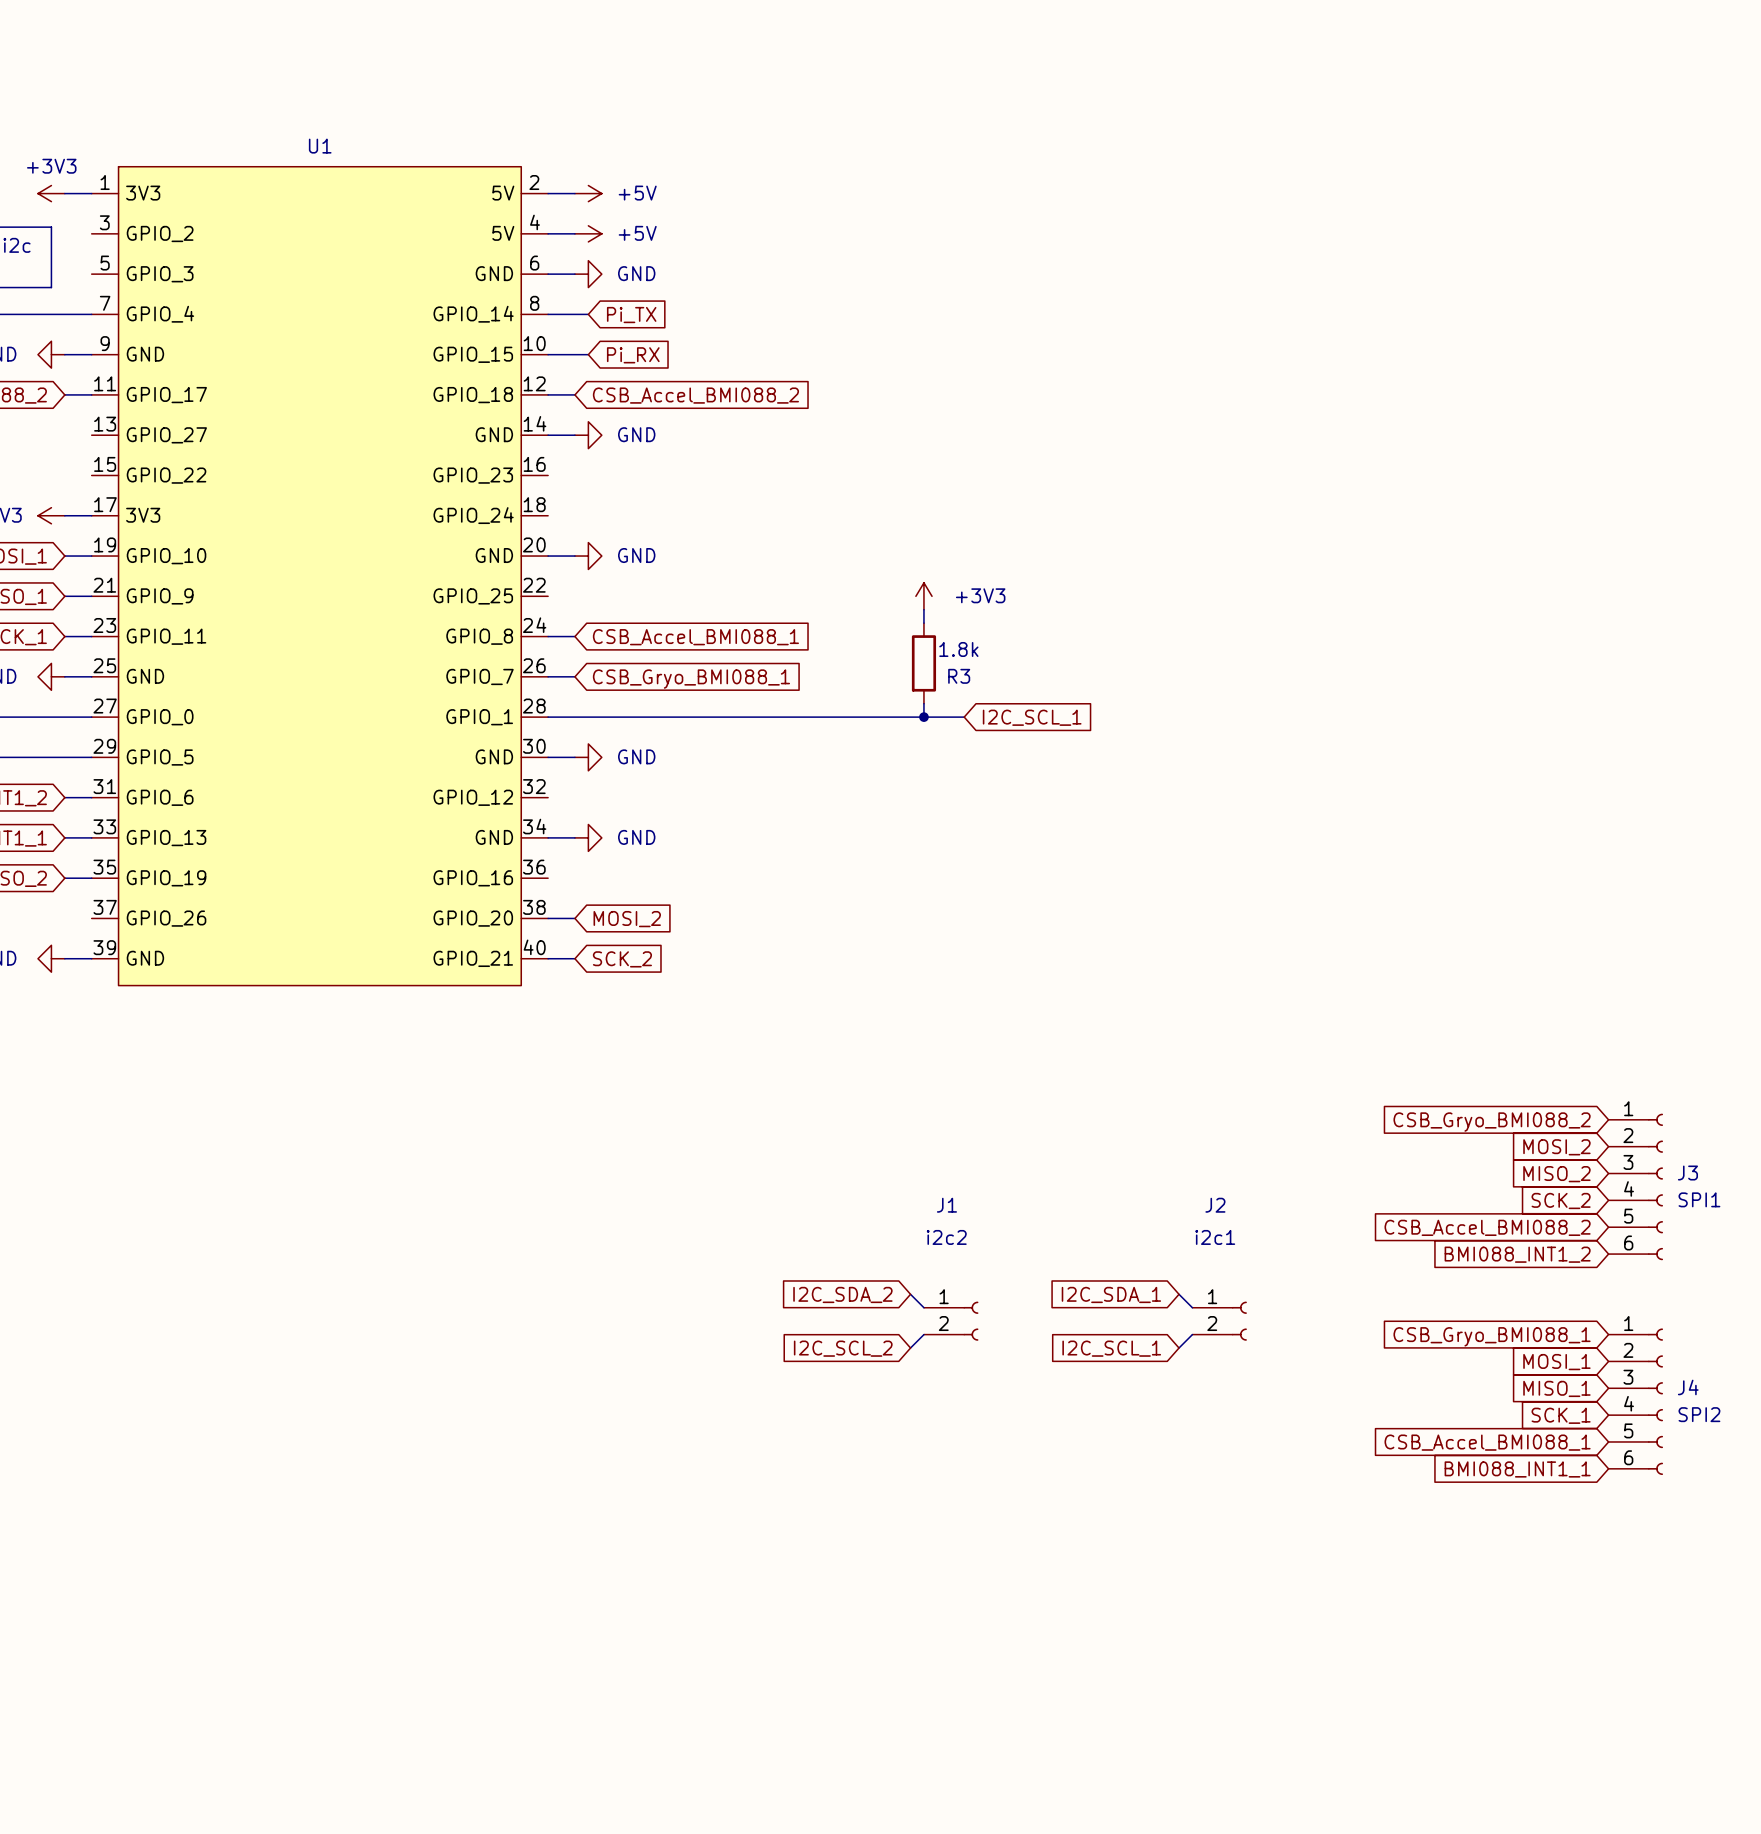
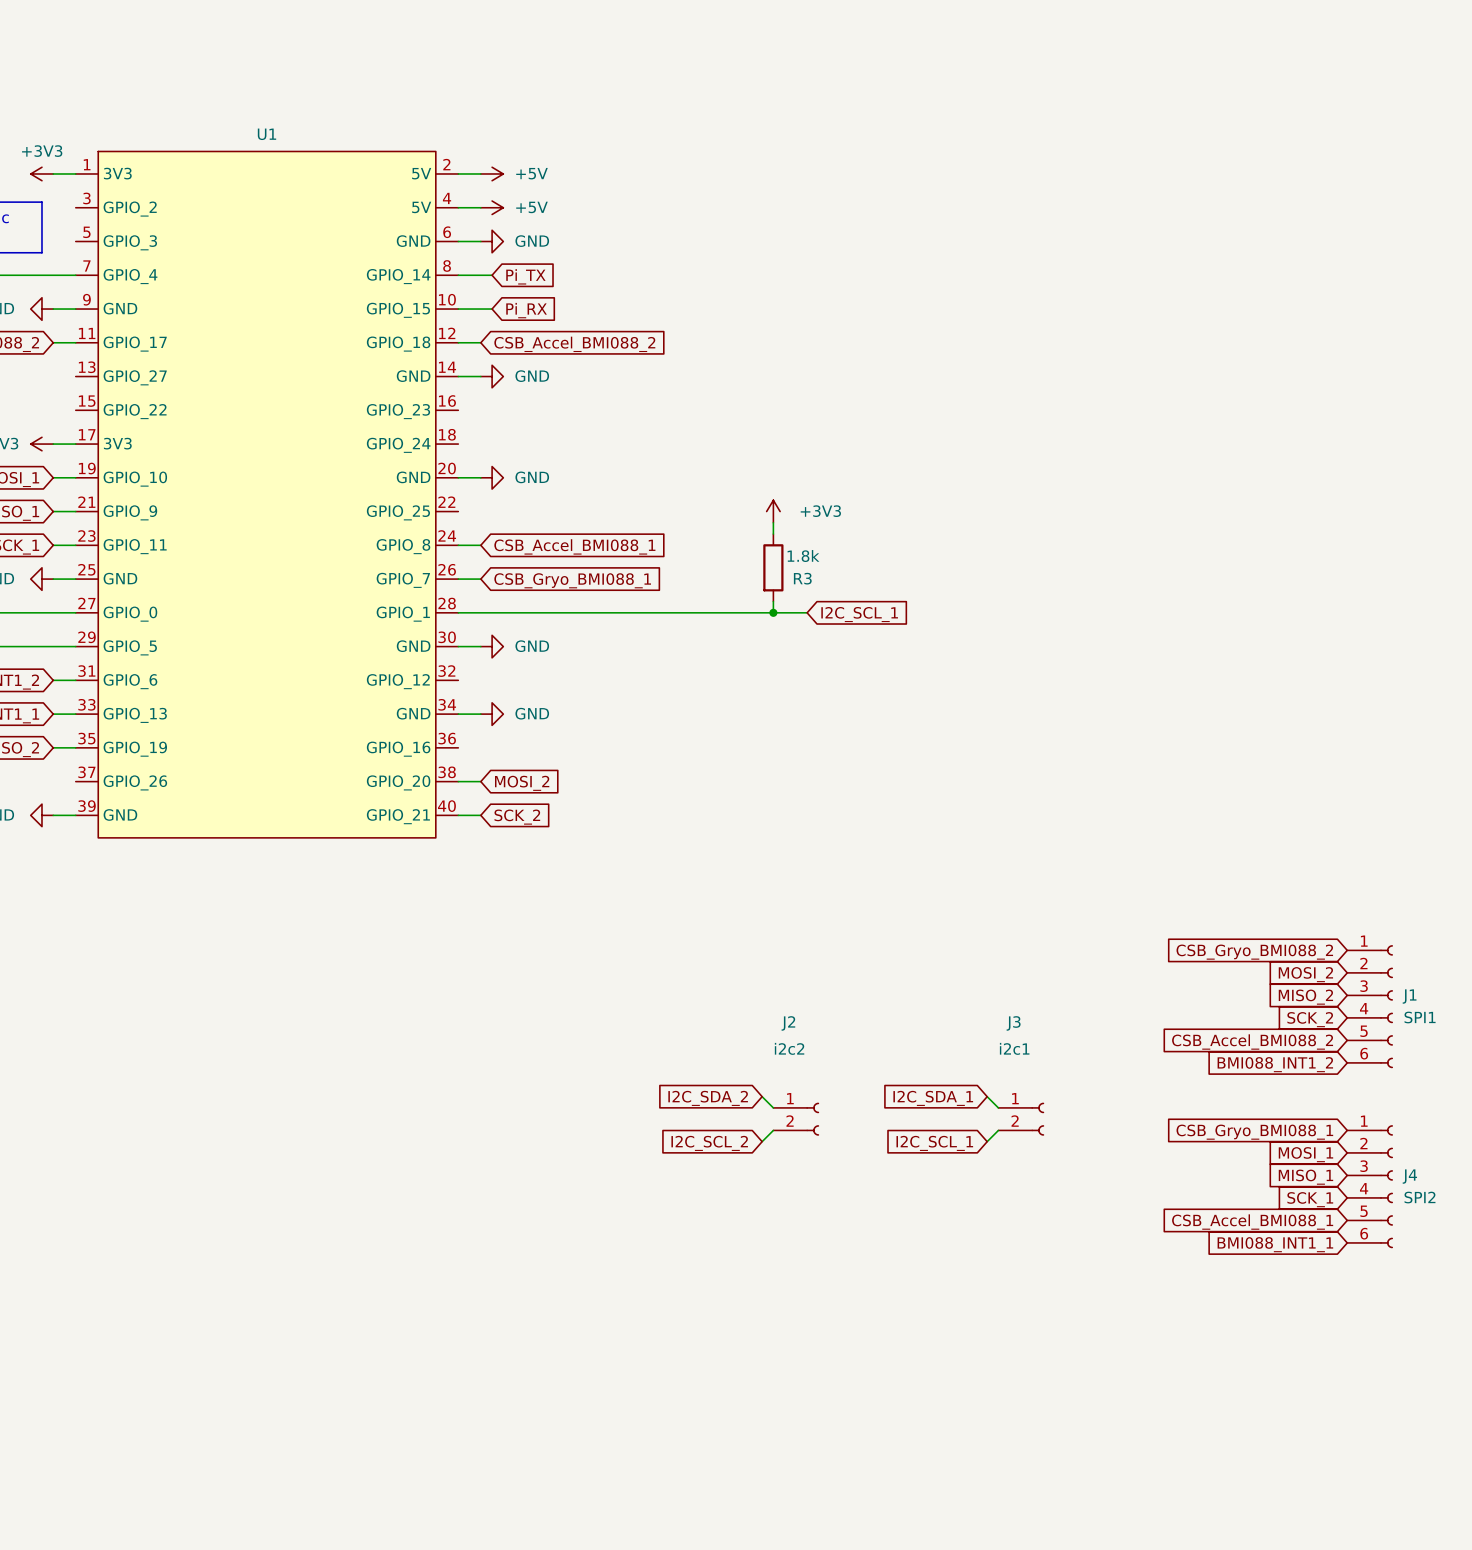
J3 name: J3 (1687, 1173) -> J1 (1409, 996)
J1 name: J1 (946, 1205) -> J2 (788, 1023)
J2 name: J2 (1215, 1205) -> J3 (1013, 1023)

